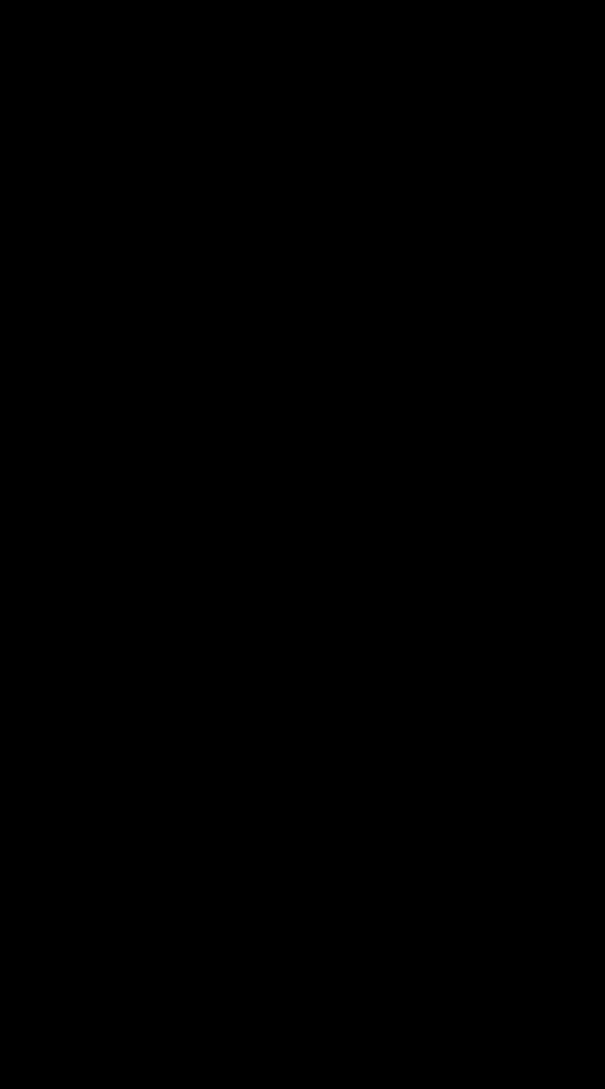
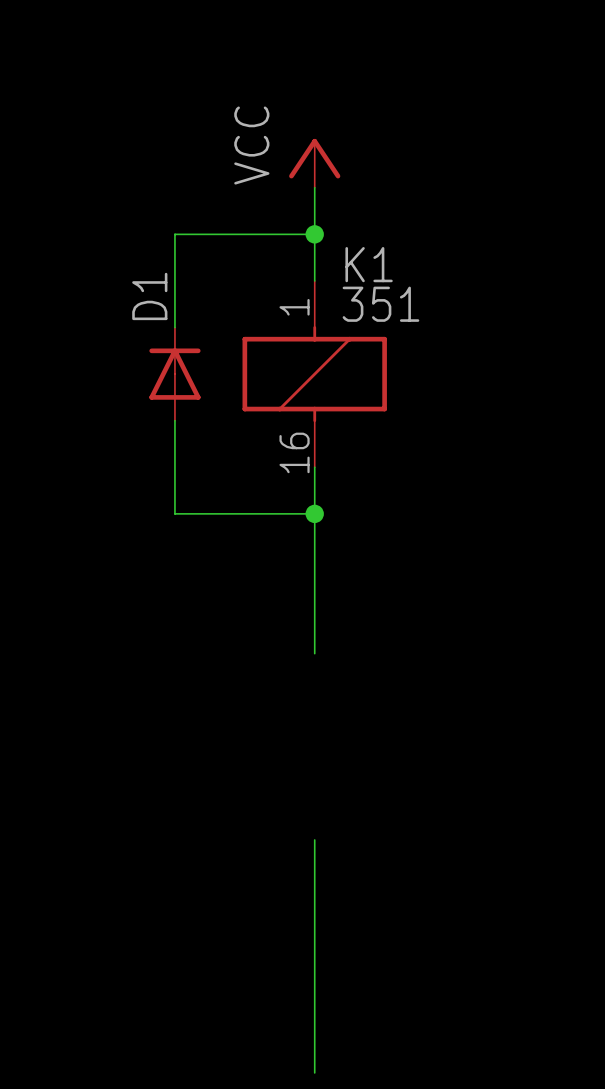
power symbol: none -> VCC (314, 163)
wire: none -> (314, 187) (314, 280)
wire: none -> (314, 234) (174, 234) (174, 327)
junction: none -> (314, 234)
D1: none -> (174, 374)
K1: none -> 351 (314, 374)
wire: none -> (174, 420) (174, 513) (314, 513)
wire: none -> (314, 467) (314, 653)
junction: none -> (314, 513)
wire: none -> (314, 839) (314, 1072)

